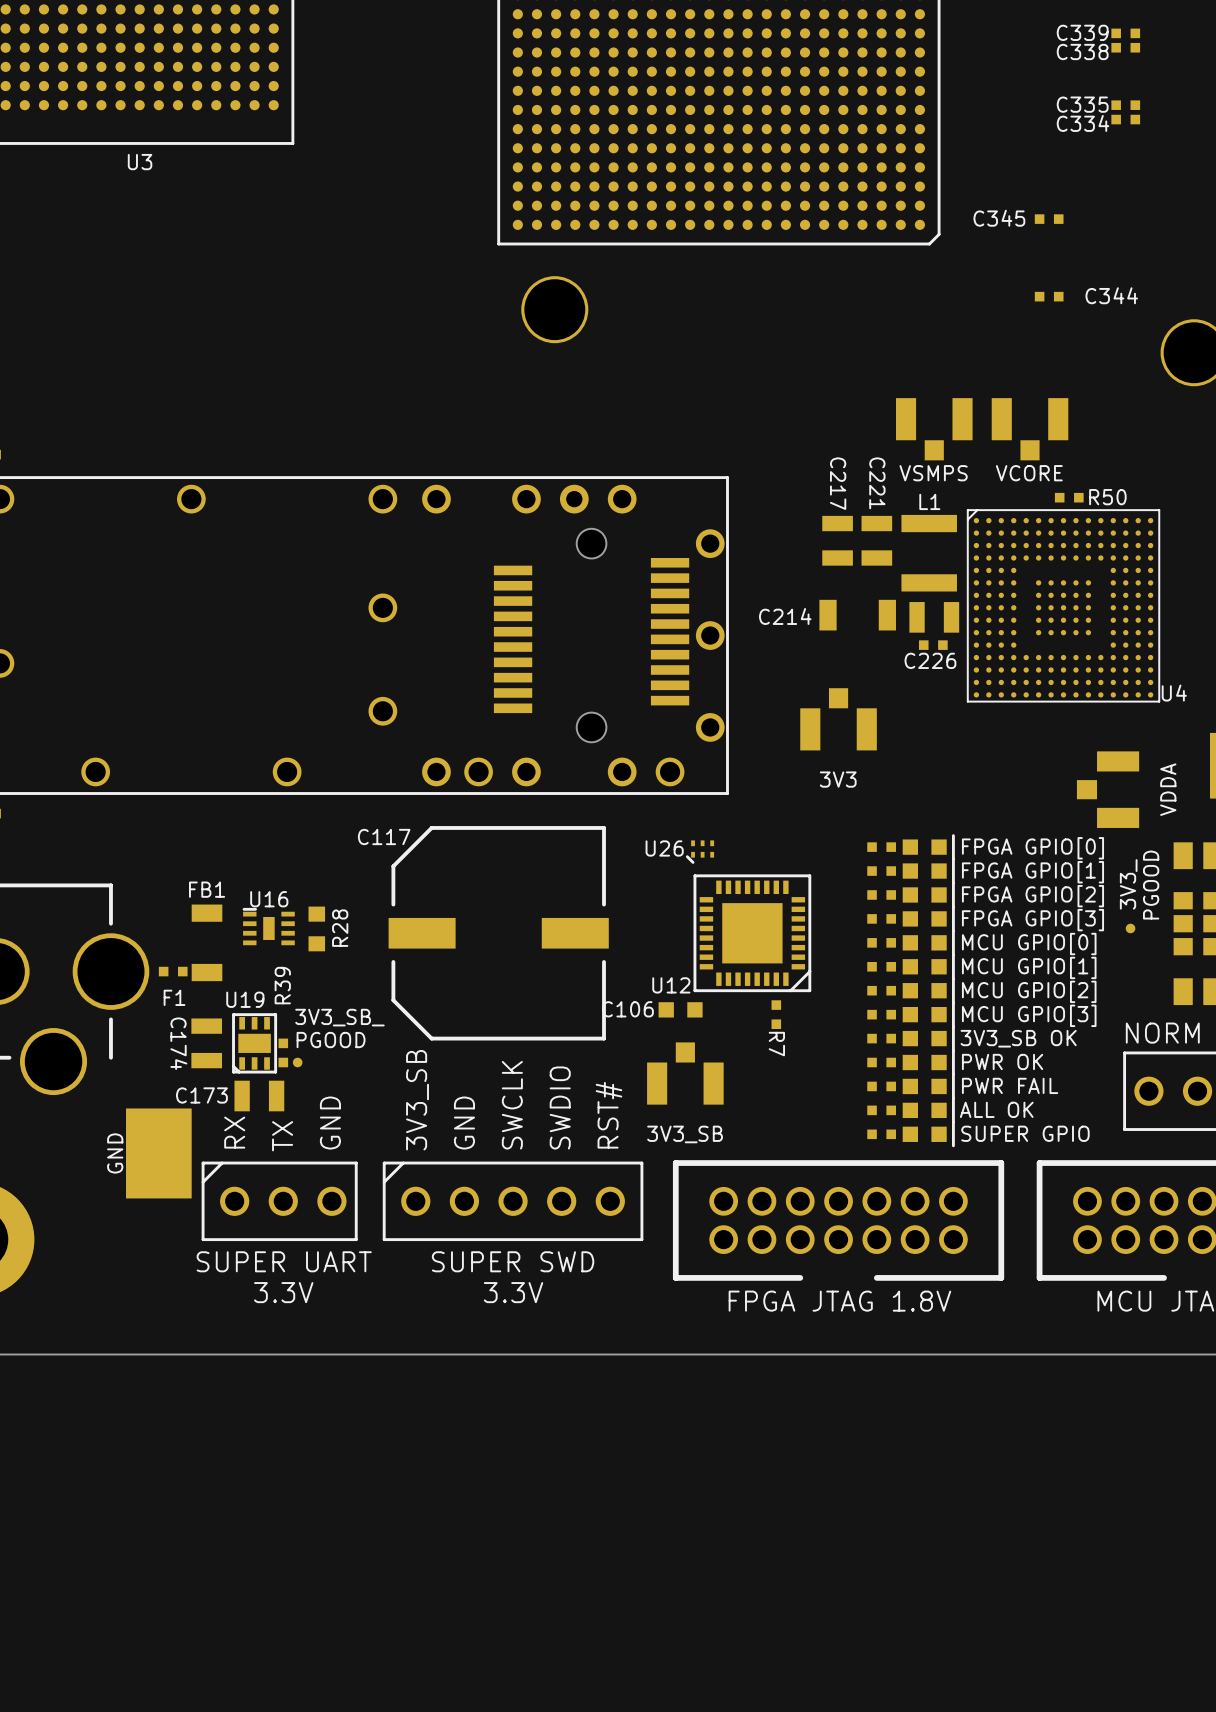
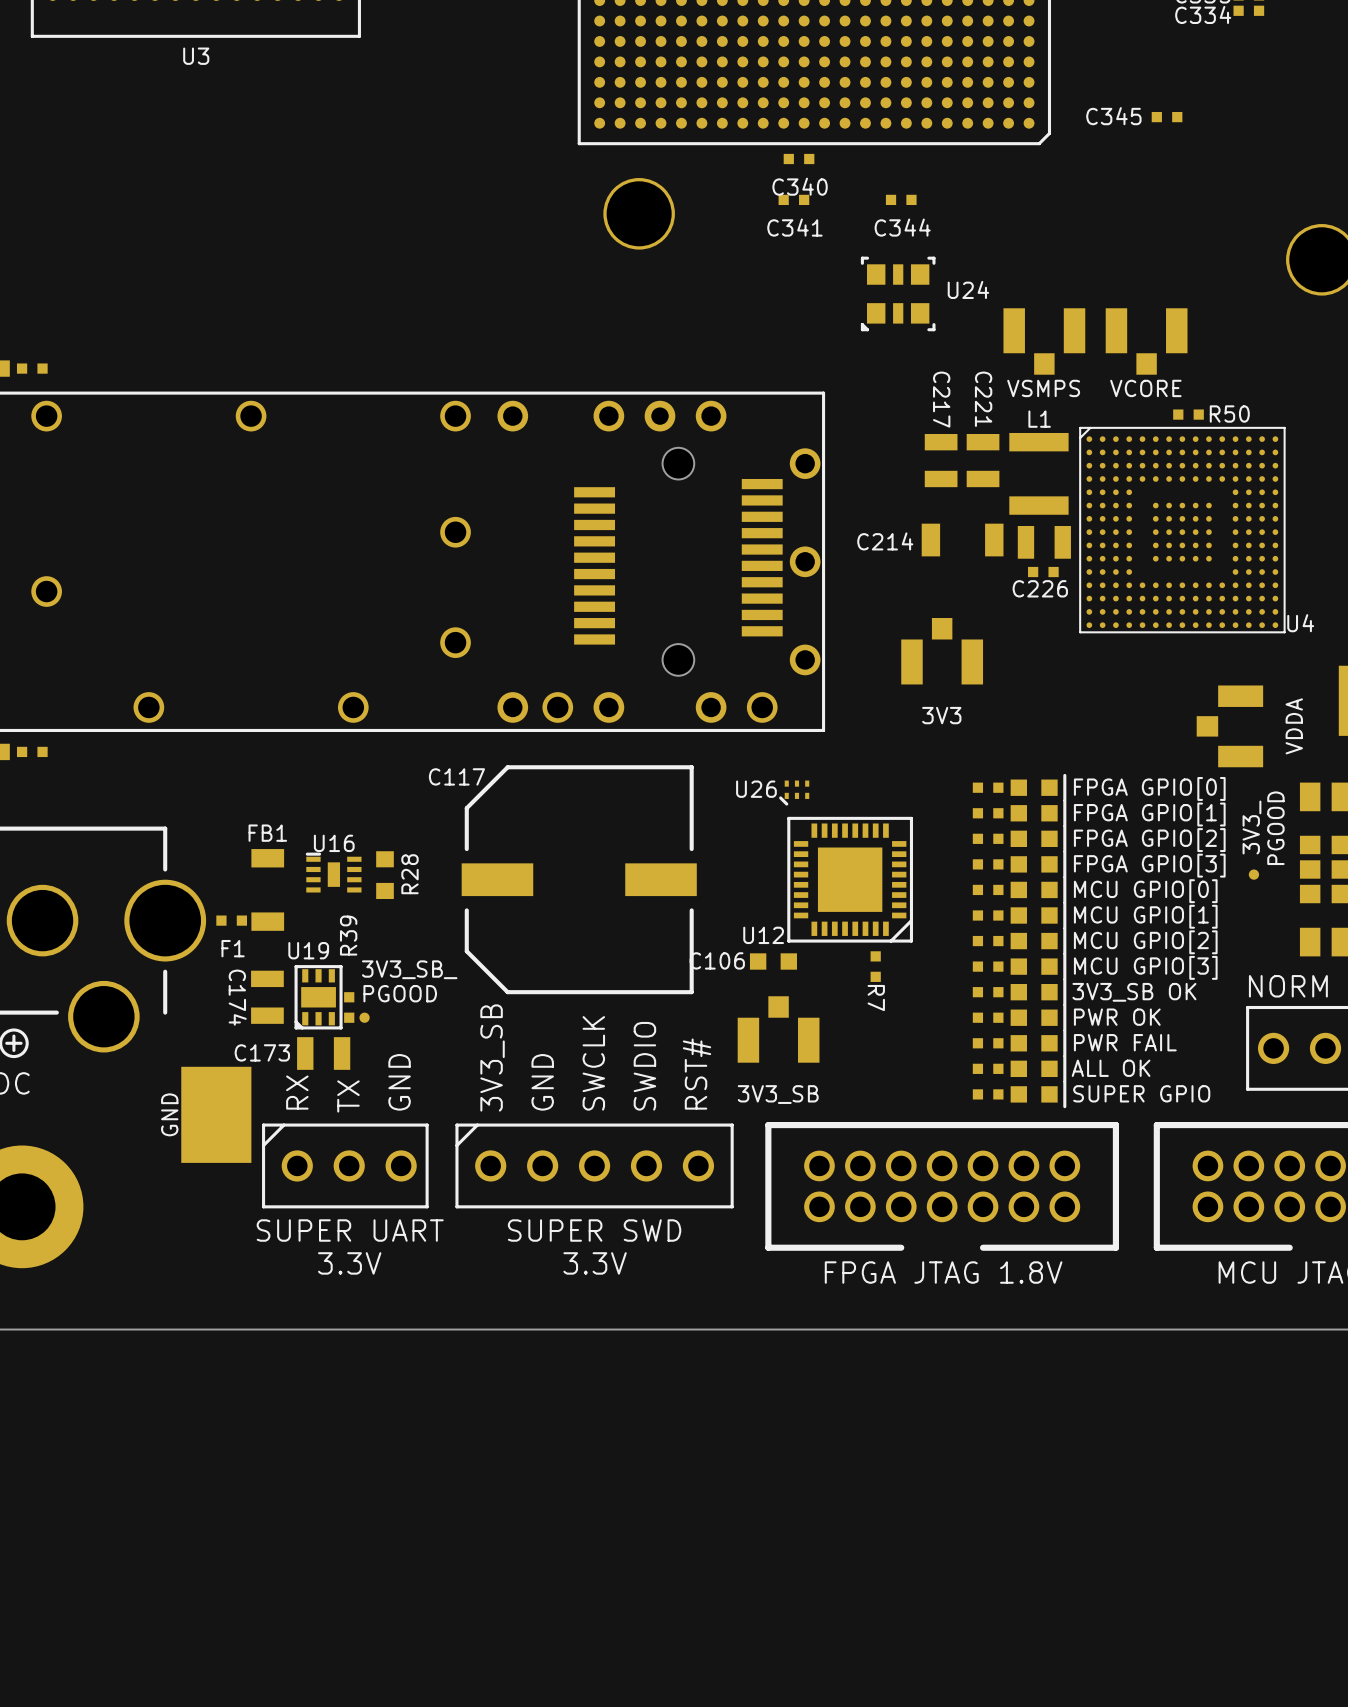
C340: none -> (799, 159)
C344 name position: C344 (1111, 295) -> C344 (902, 227)
C341: none -> (793, 199)
C344 position: (1049, 296) -> (901, 199)
U24: none -> (898, 293)

